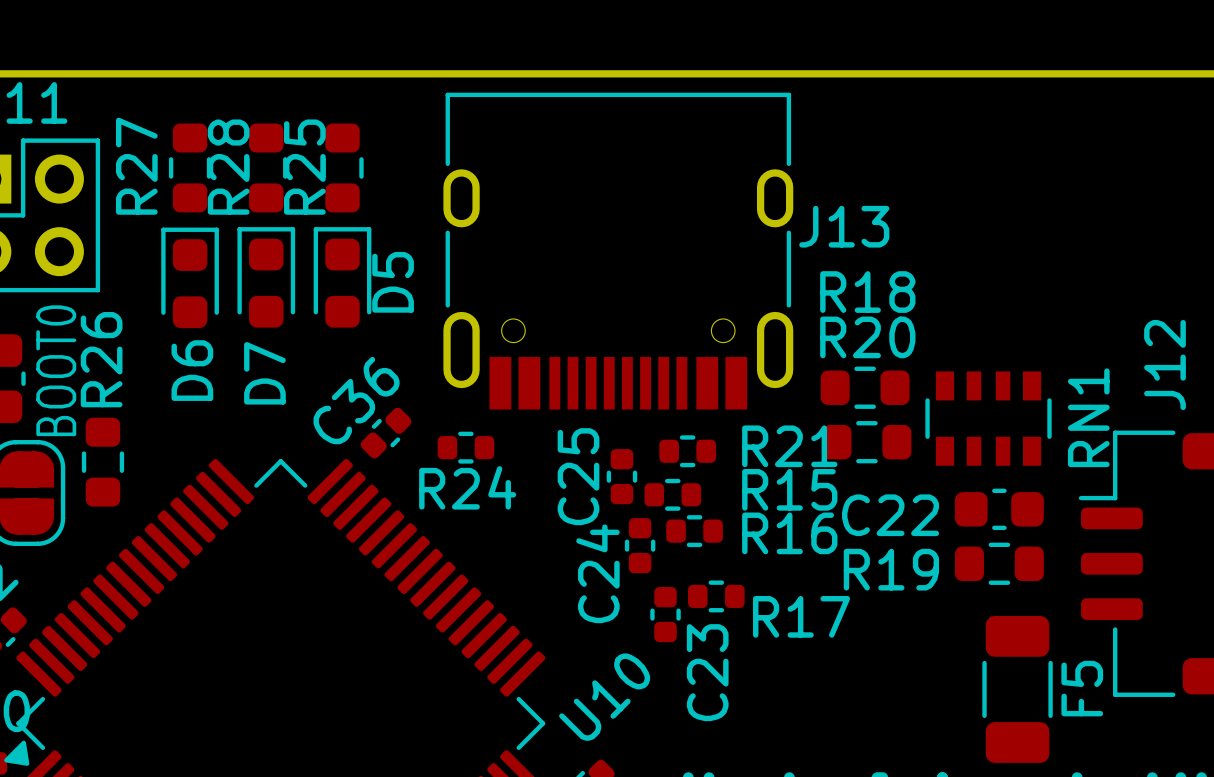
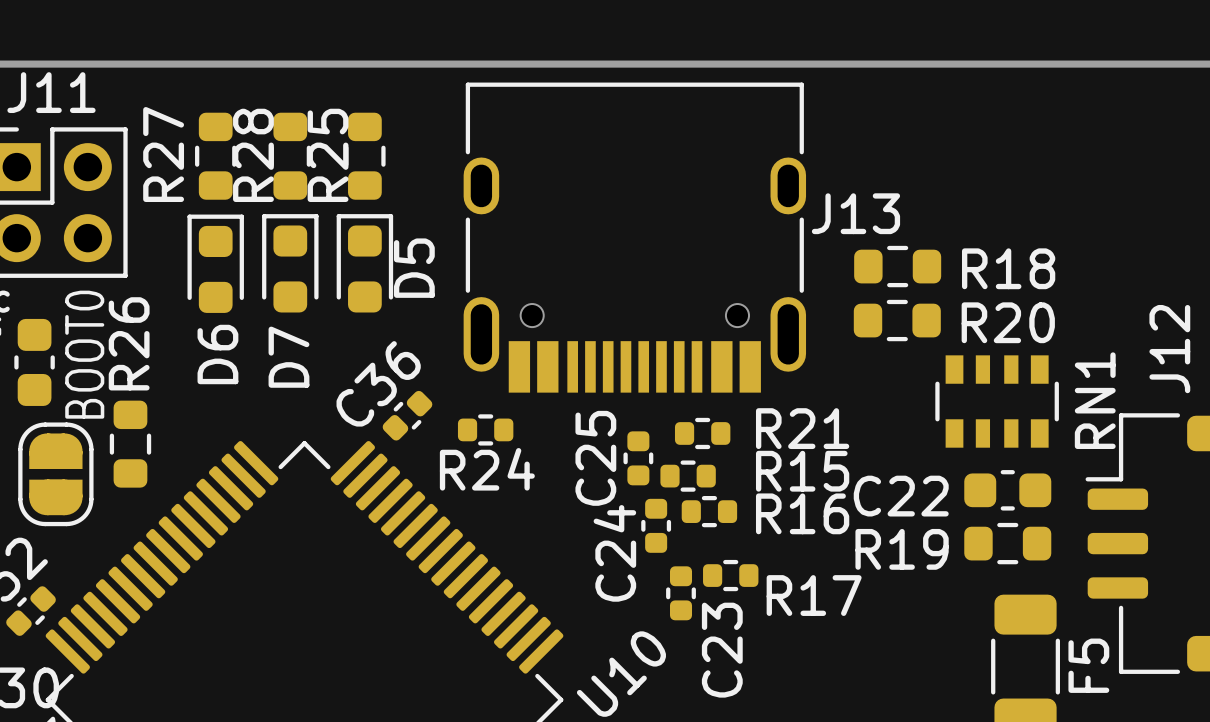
R18 name position: R18 (867, 292) -> R18 (1008, 268)
R20 name position: R20 (867, 337) -> R20 (1008, 322)
R18 position: (865, 387) -> (897, 266)
R20 position: (866, 442) -> (897, 320)

